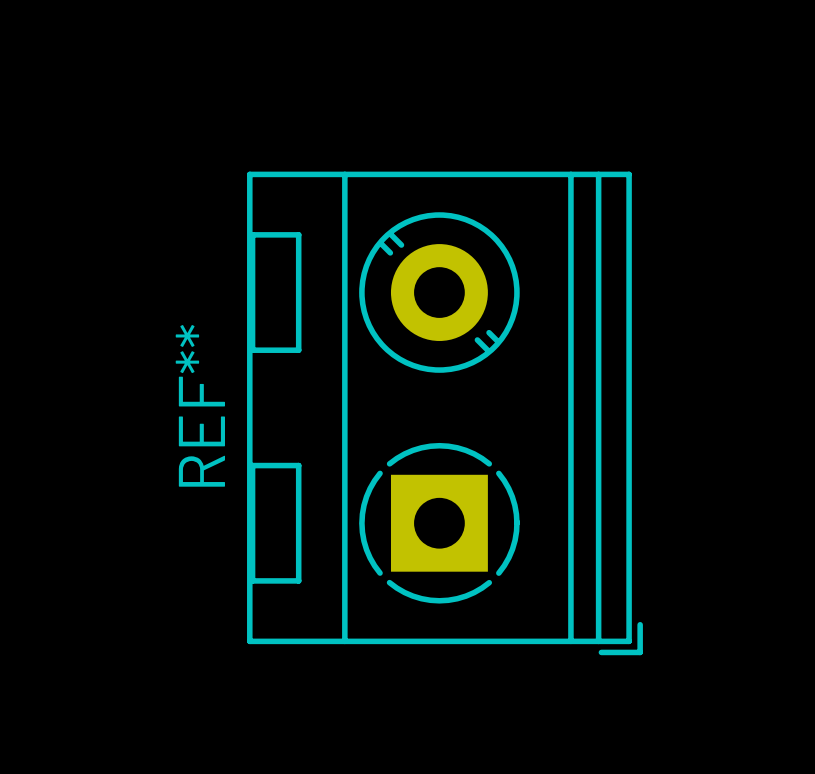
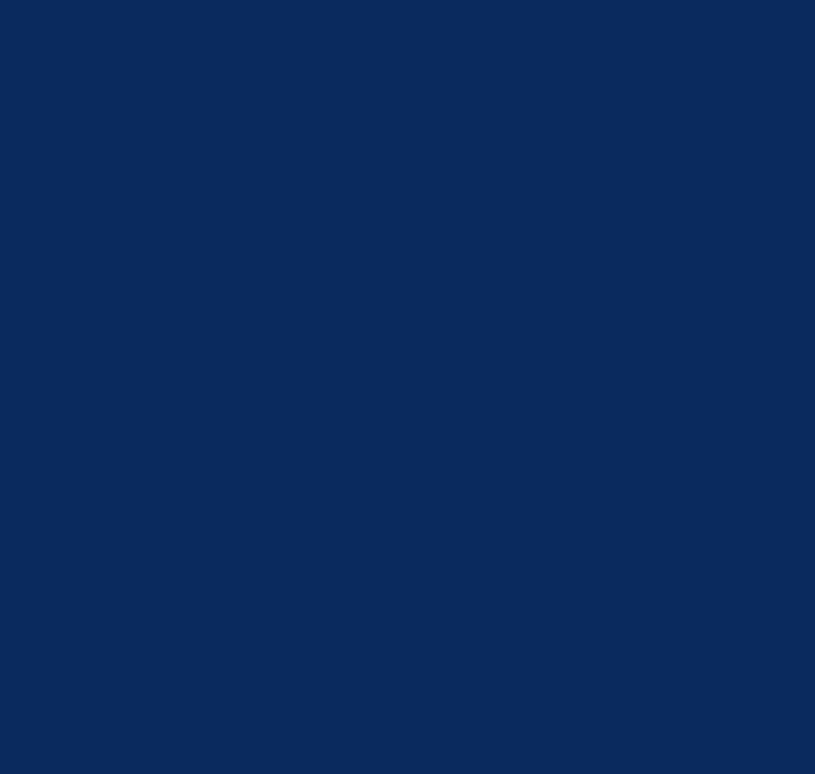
REF**: (444, 413) -> none

